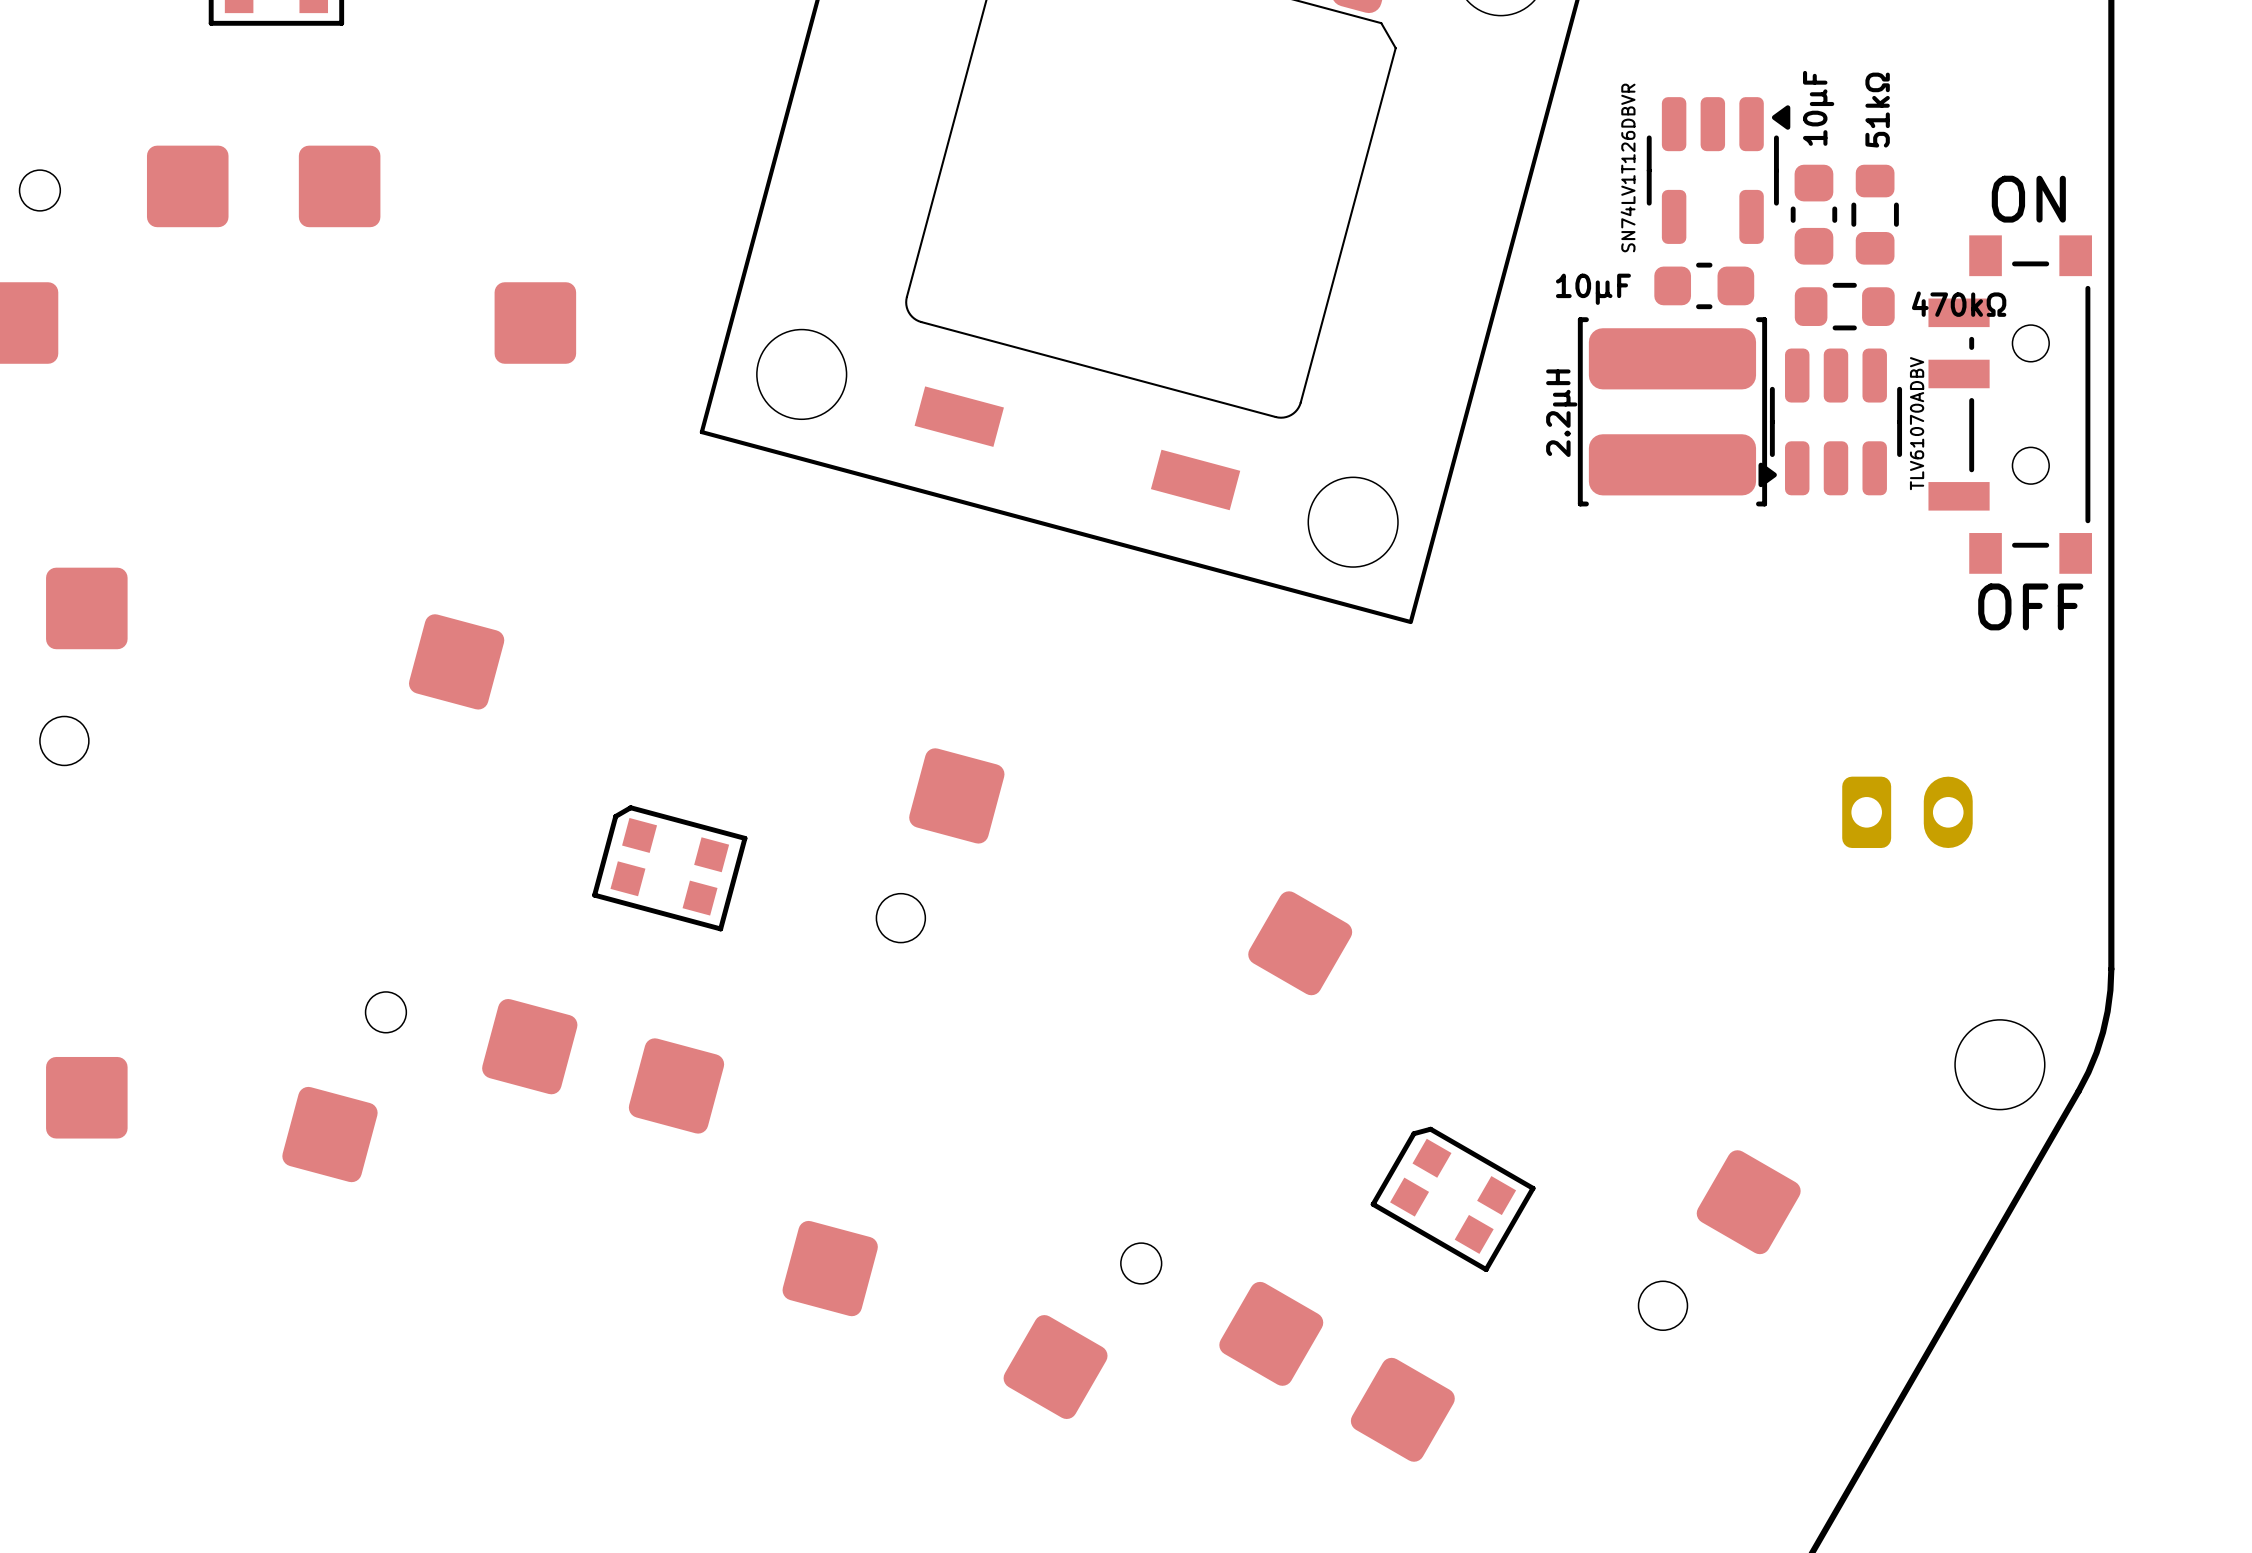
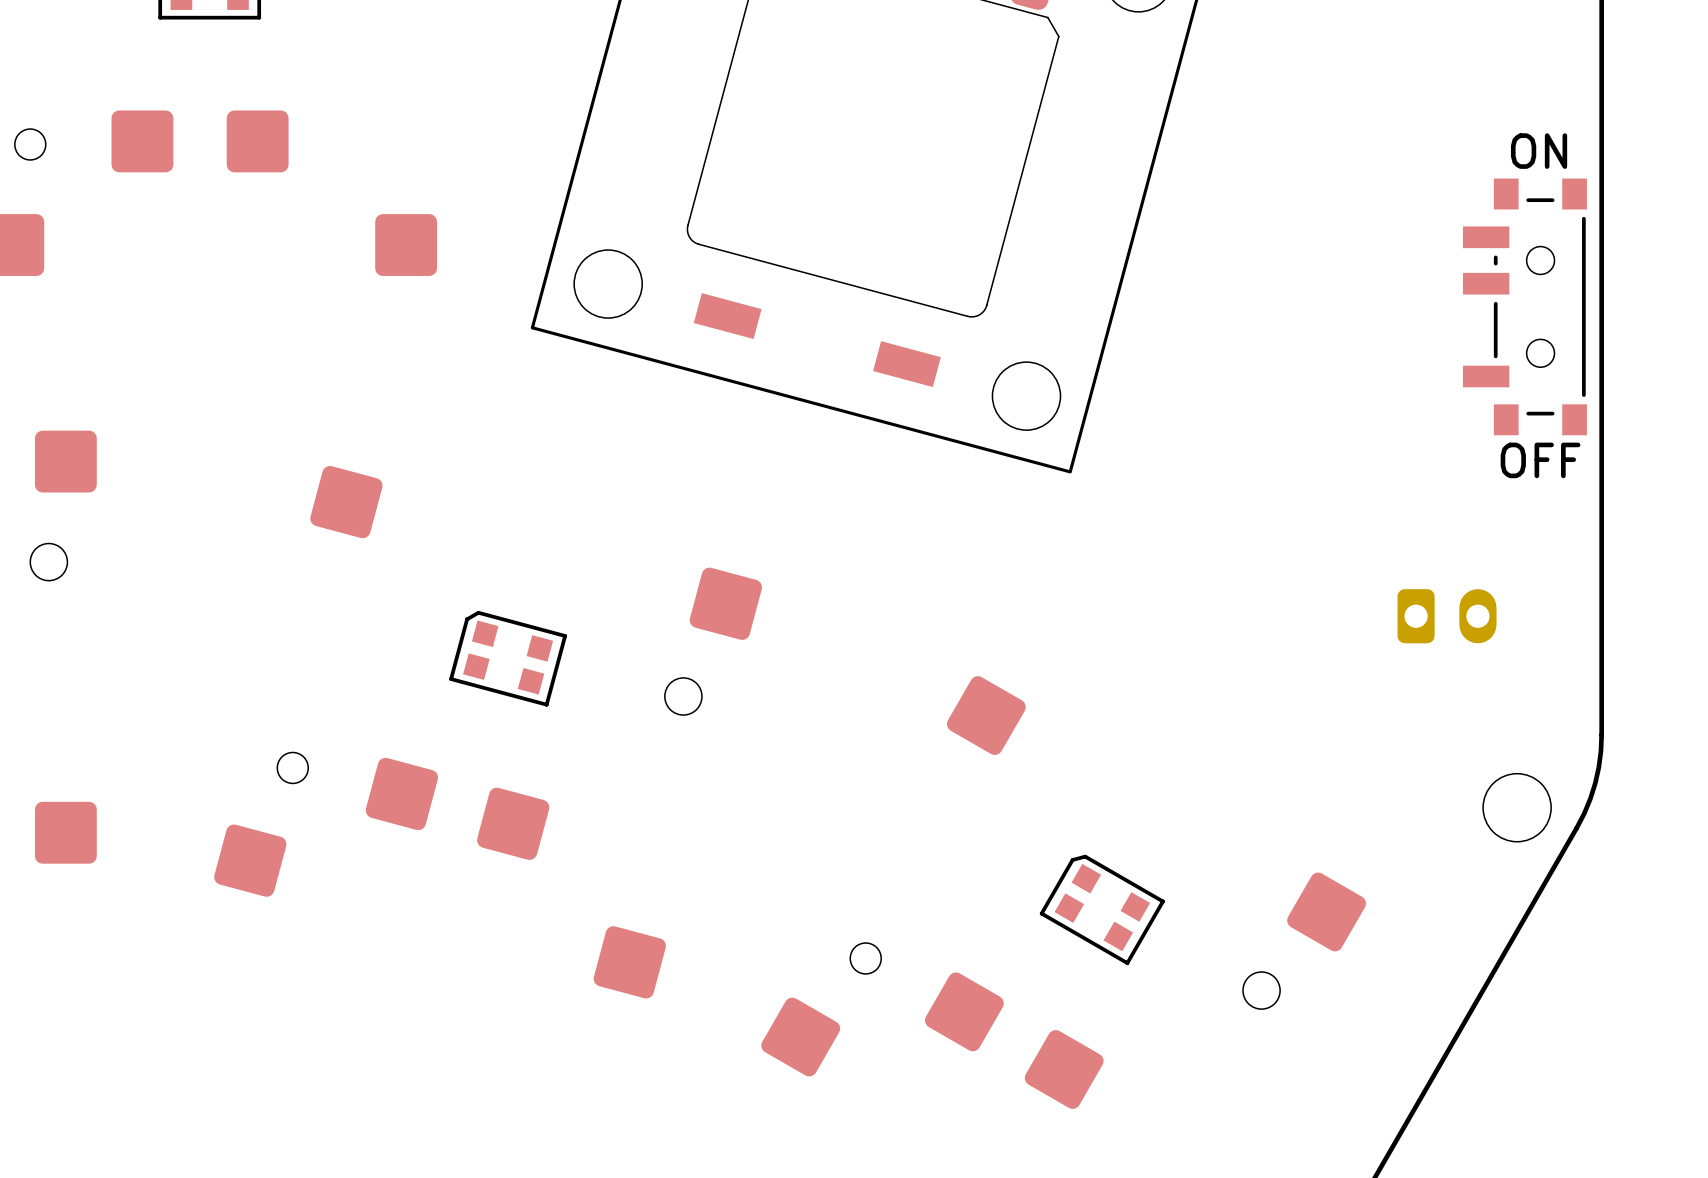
part: SN74LV1T126DBVR (1718, 170) -> none
part: 10μF (1813, 214) -> none
part: 51kΩ (1875, 214) -> none
part: 10μF (1704, 285) -> none
part: 470kΩ (1844, 306) -> none
part: 2.2μH (1672, 411) -> none
part: TLV61070ADBV (1830, 421) -> none

